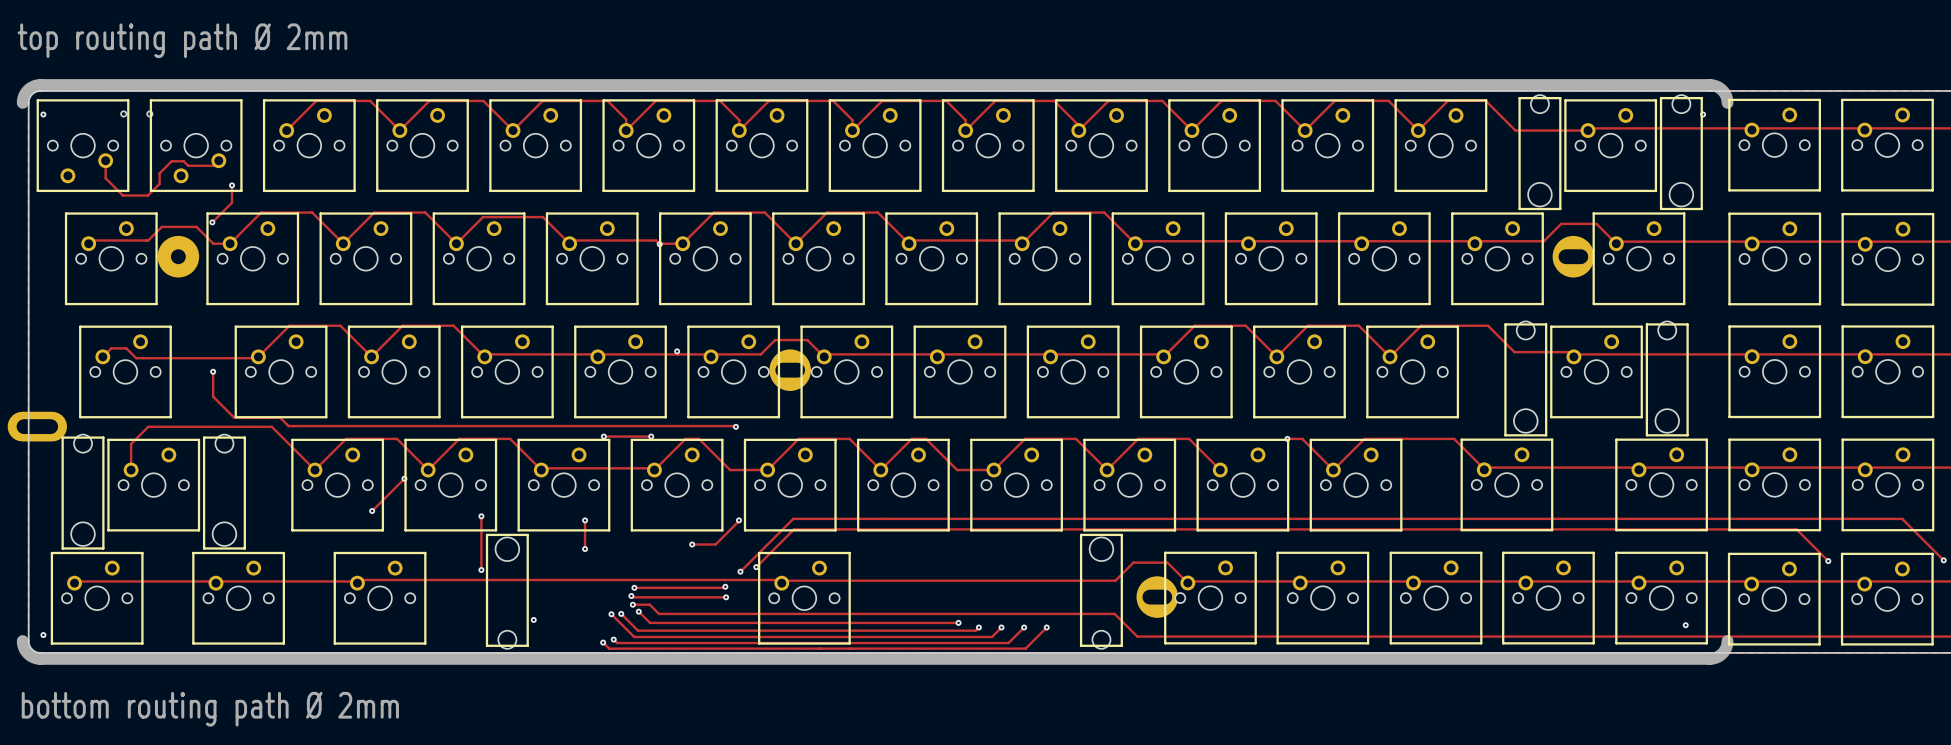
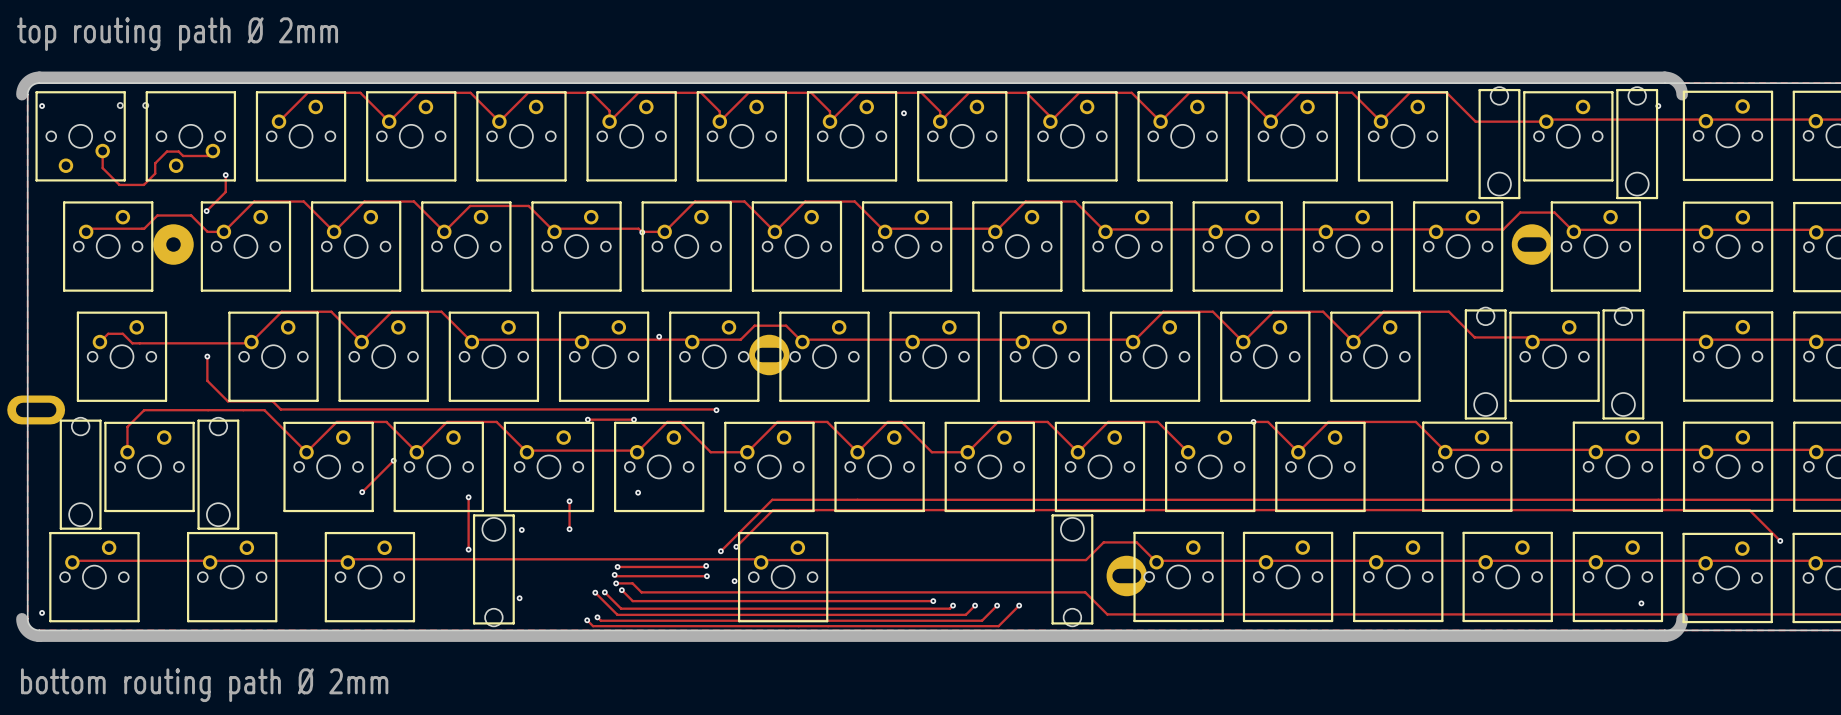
via: none -> (903, 113)
via: none -> (638, 492)
track: (738, 520) (715, 544) (692, 544) -> none
via: (738, 520) -> none
via: (692, 544) -> none
via: none -> (521, 529)
via: none -> (734, 581)

